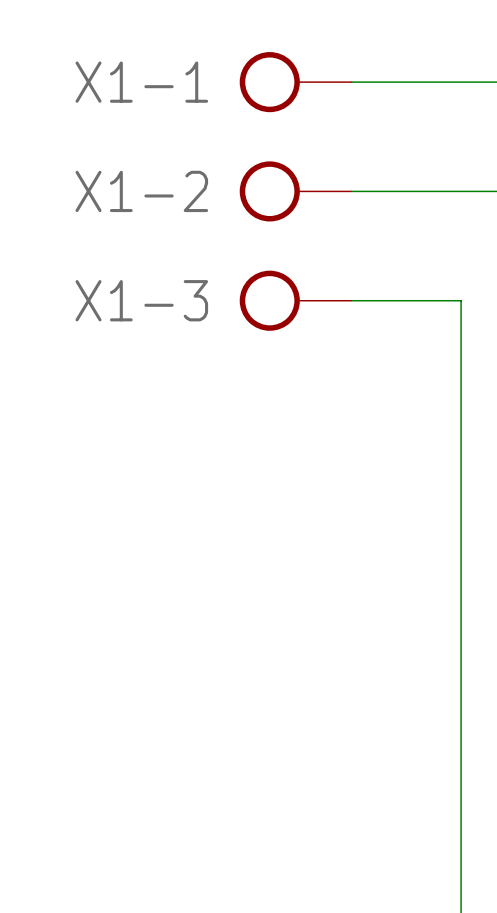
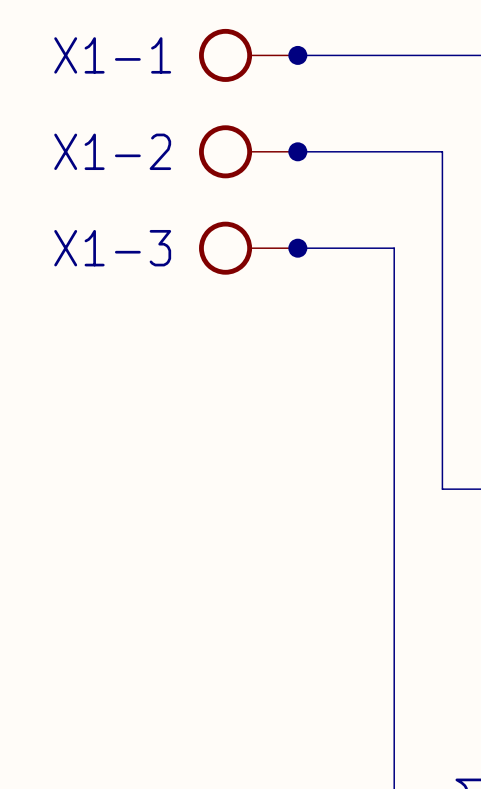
junction: none -> (297, 55)
junction: none -> (297, 151)
junction: none -> (297, 248)

